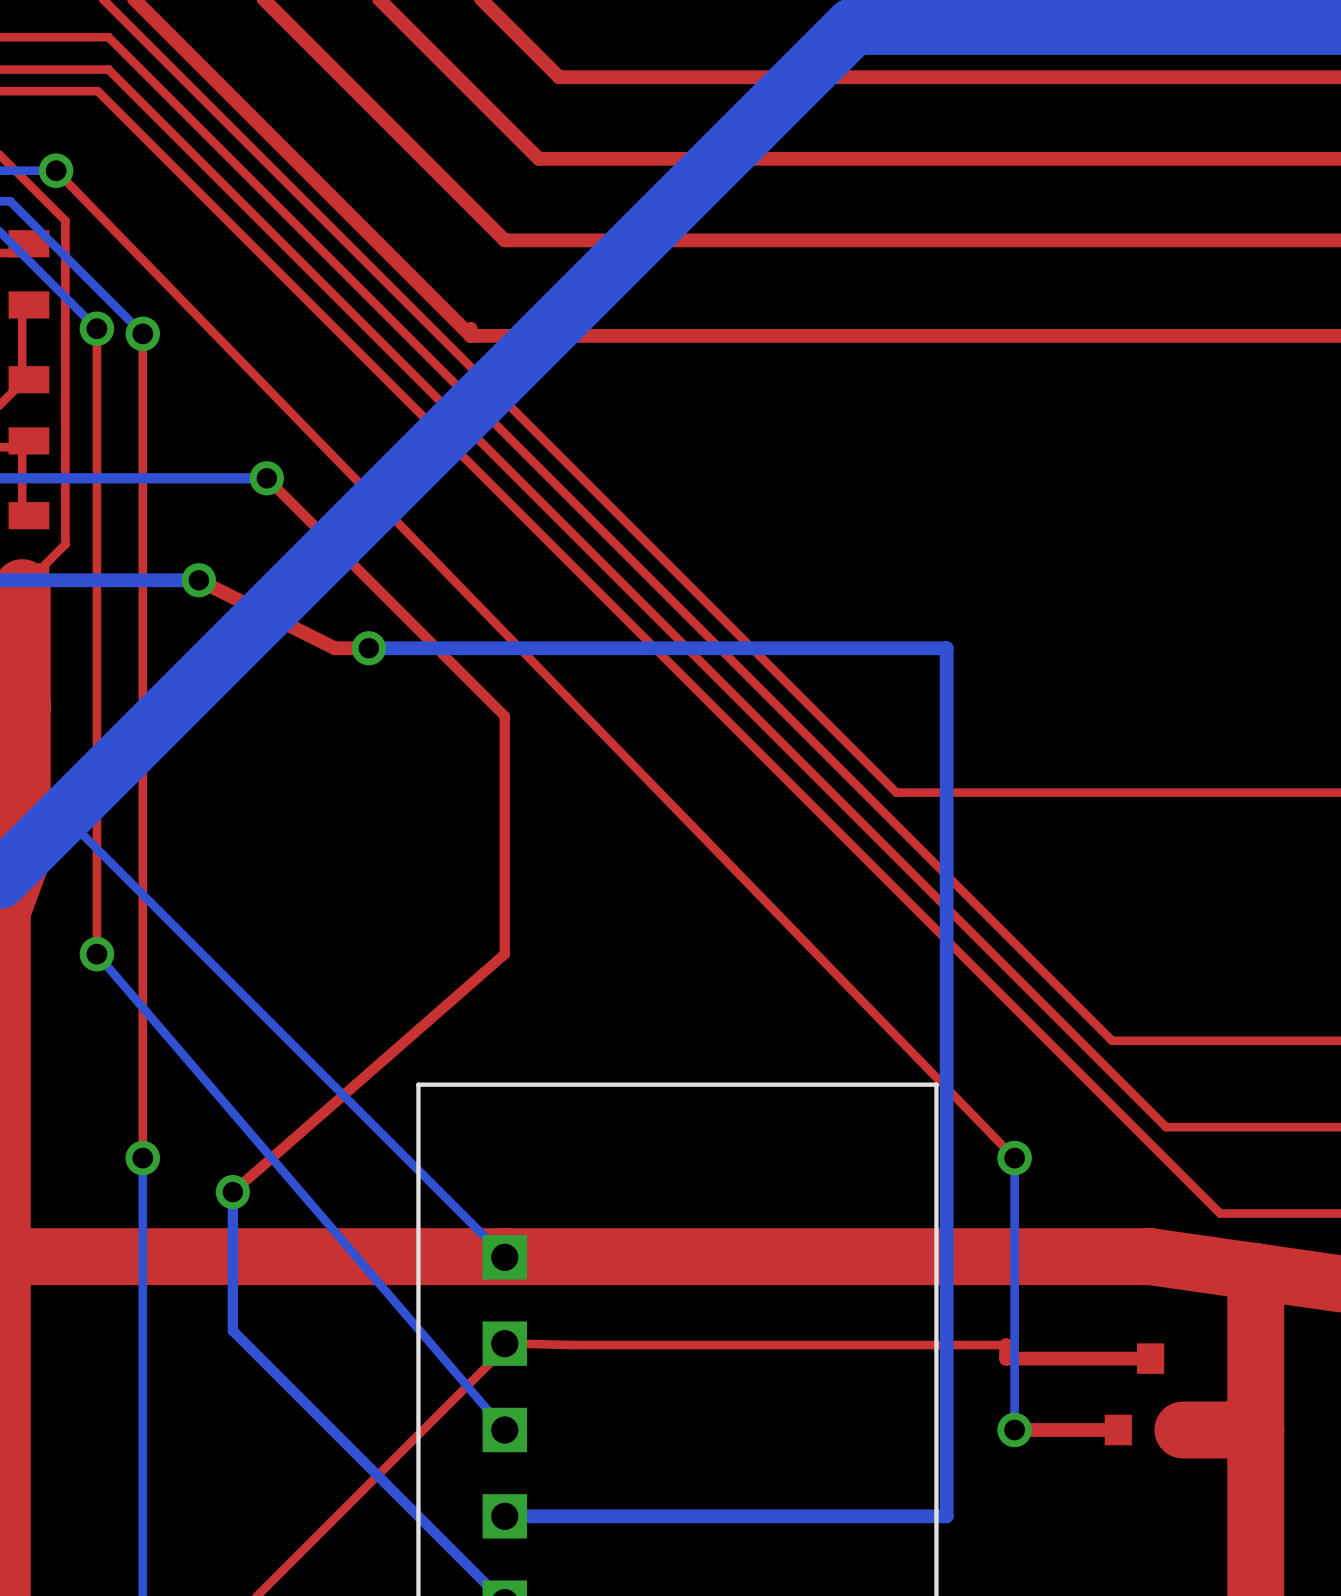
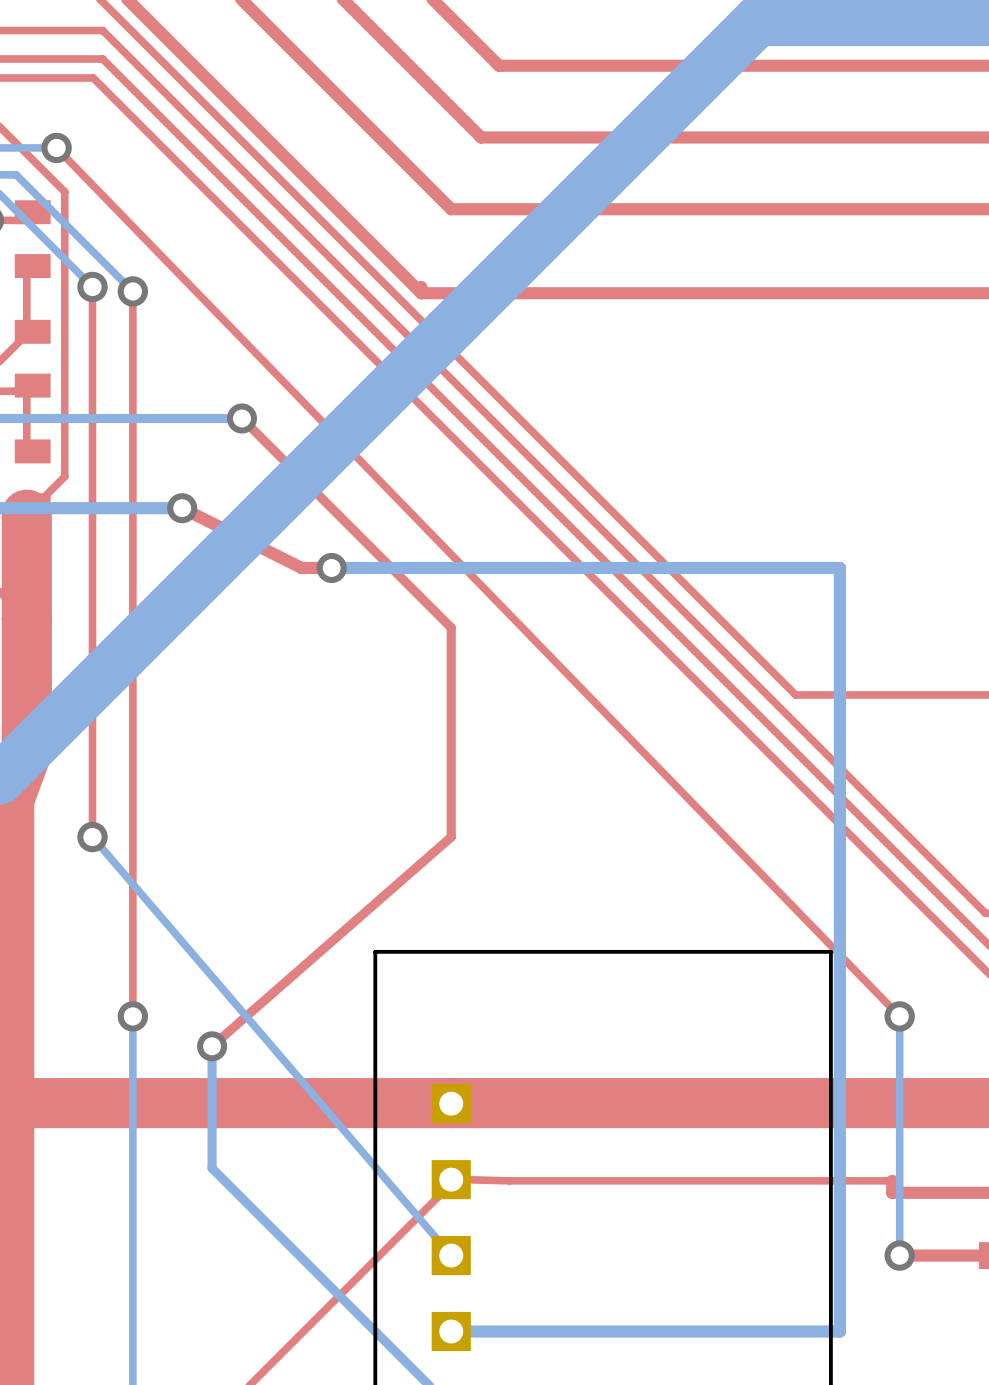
bottom track: (63, 815) (504, 1256) -> none

